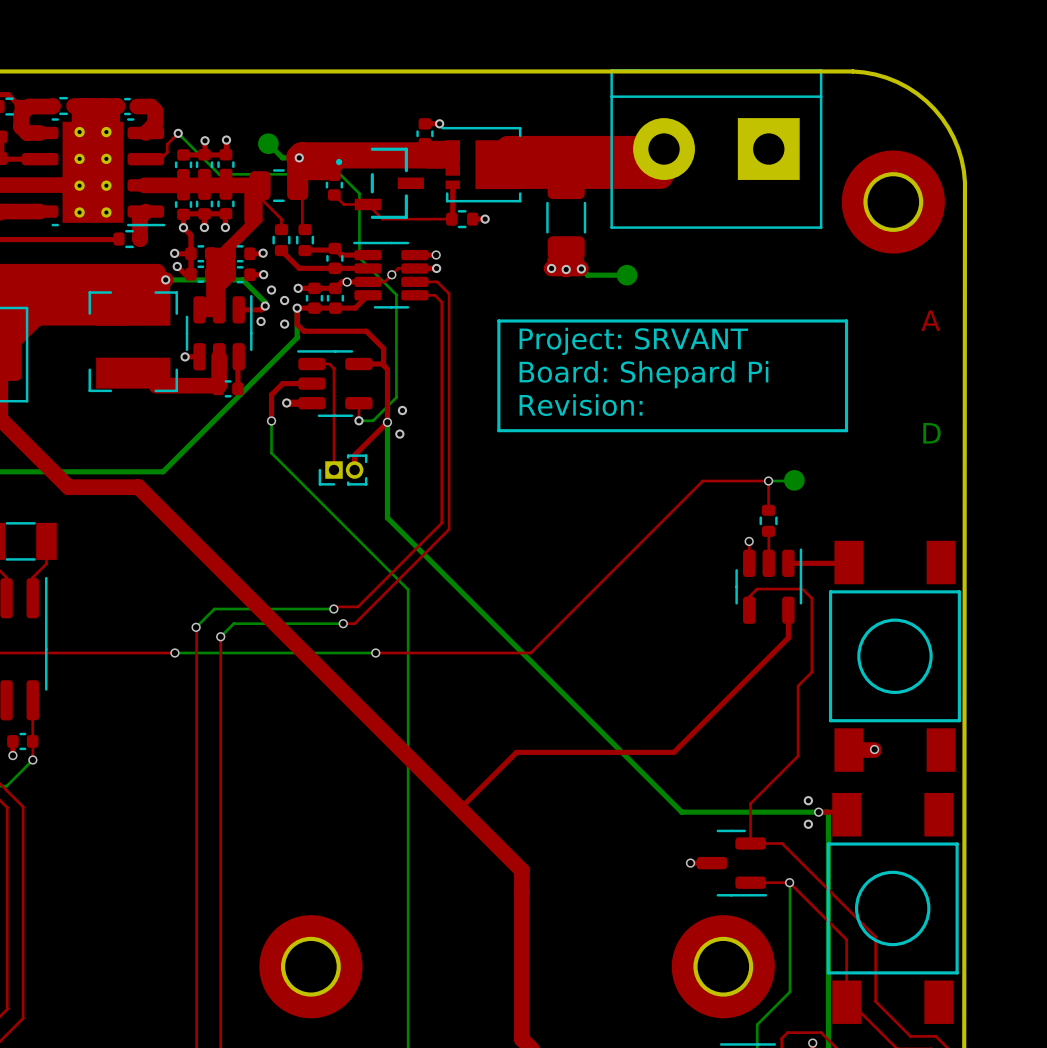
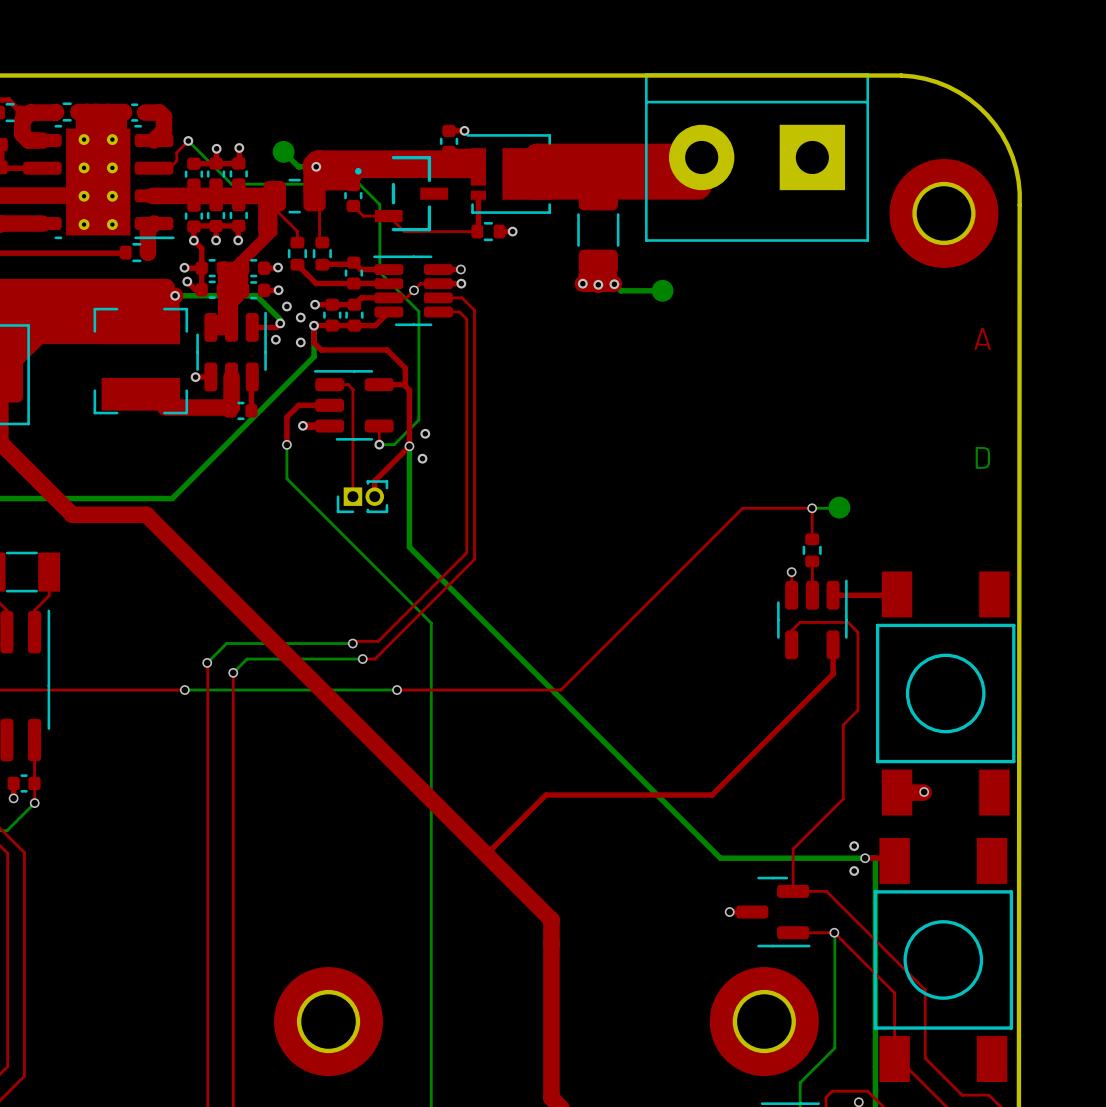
via: (347, 282) -> none
line: (498, 321) (846, 321) (846, 430) (498, 430) (498, 321) -> none
text: Project: SRVANT (633, 341) -> none
text: Board: Shepard Pi (643, 374) -> none
text: Revision: (581, 405) -> none

